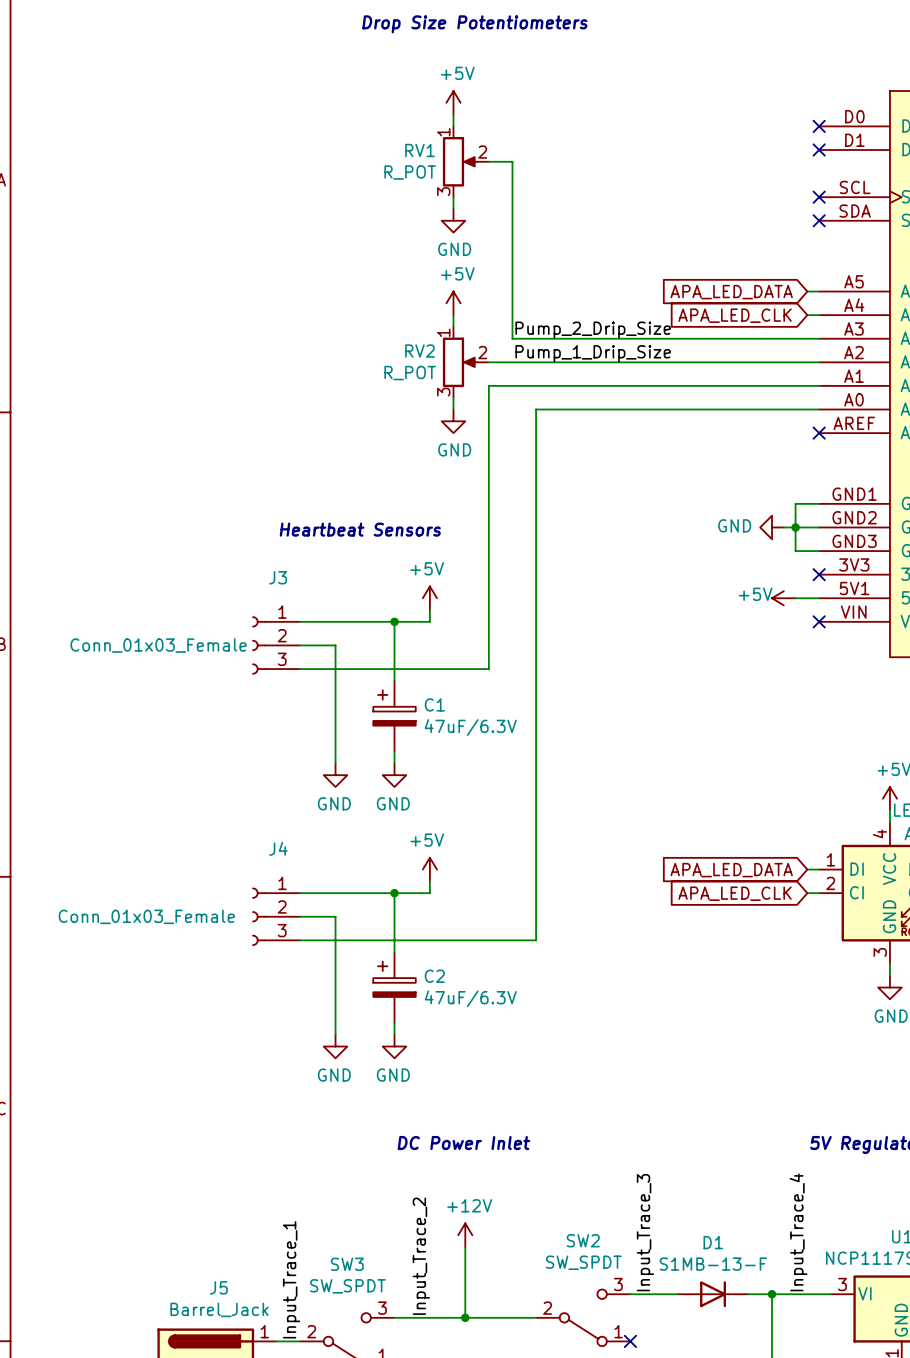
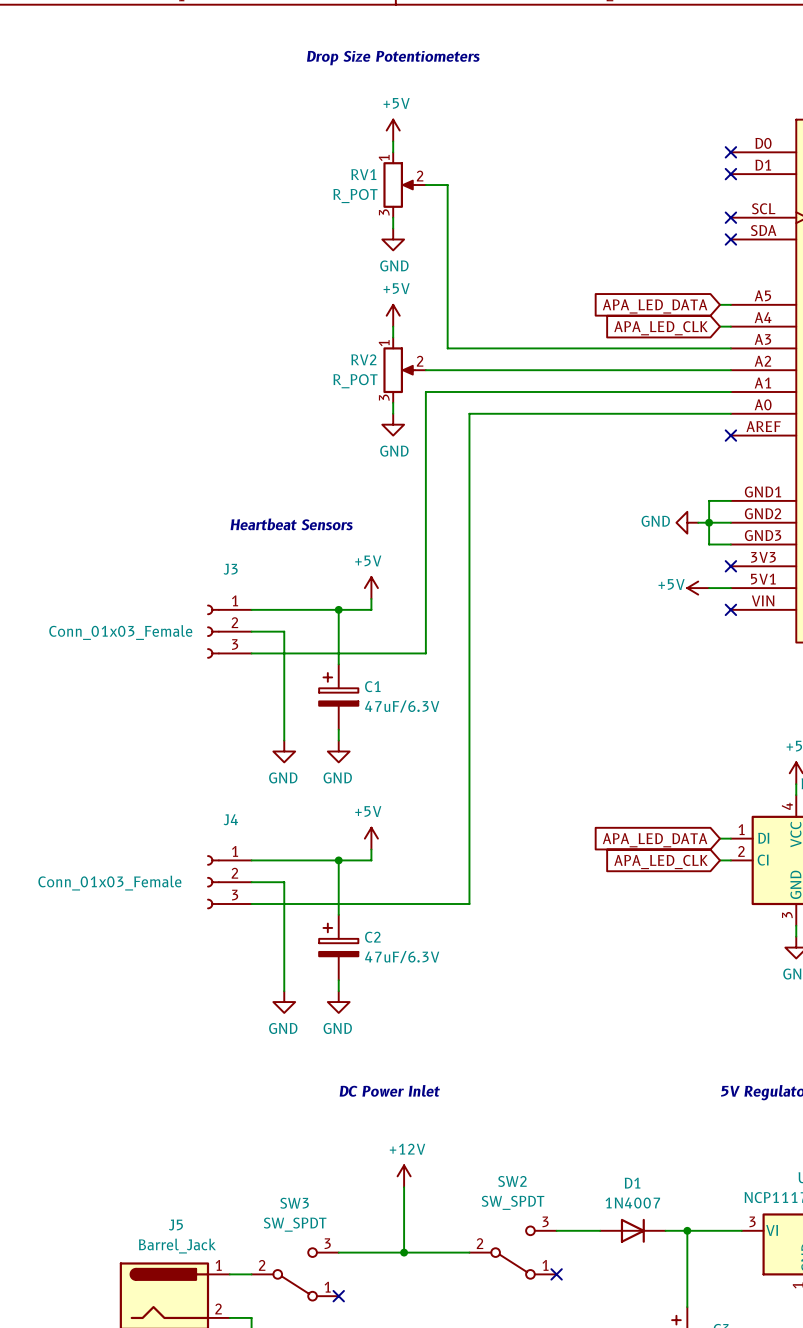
label: Pump_2_Drip_Size (593, 330) -> none
label: Pump_1_Drip_Size (593, 353) -> none
label: Input_Trace_3 (645, 1232) -> none
label: Input_Trace_4 (798, 1232) -> none
label: Input_Trace_2 (421, 1256) -> none
D1 value: S1MB-13-F (713, 1264) -> 1N4007 (632, 1203)
label: Input_Trace_1 (291, 1279) -> none

